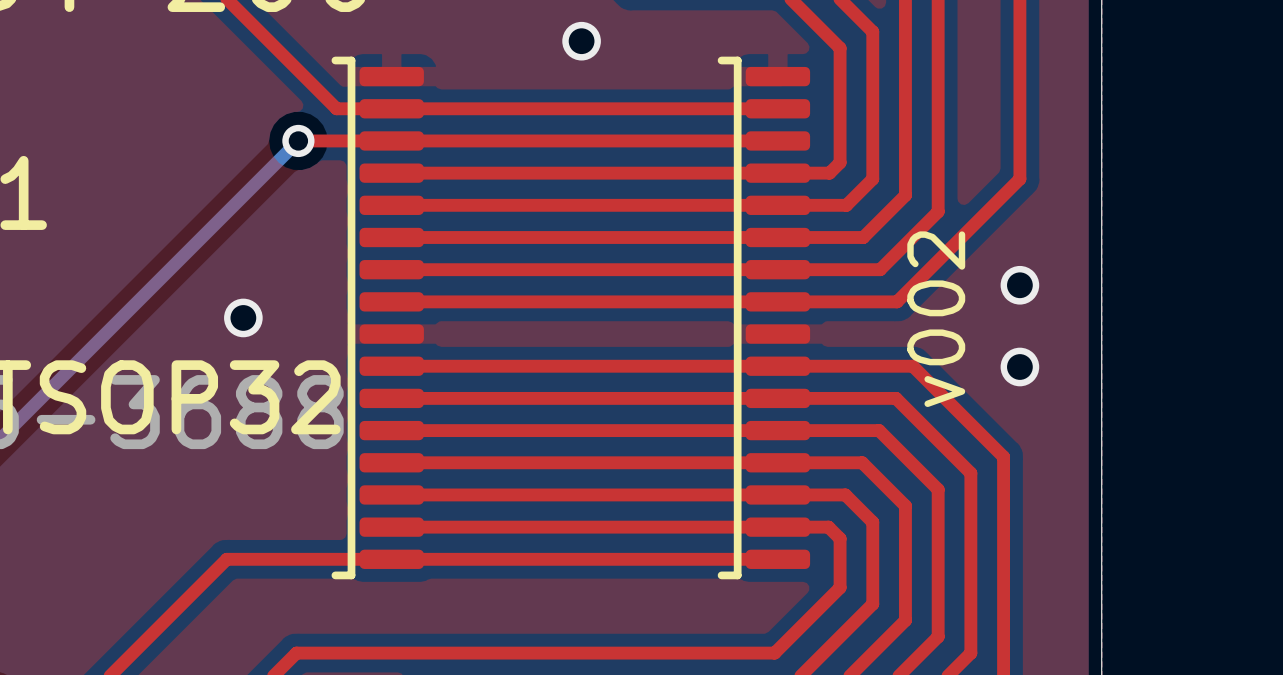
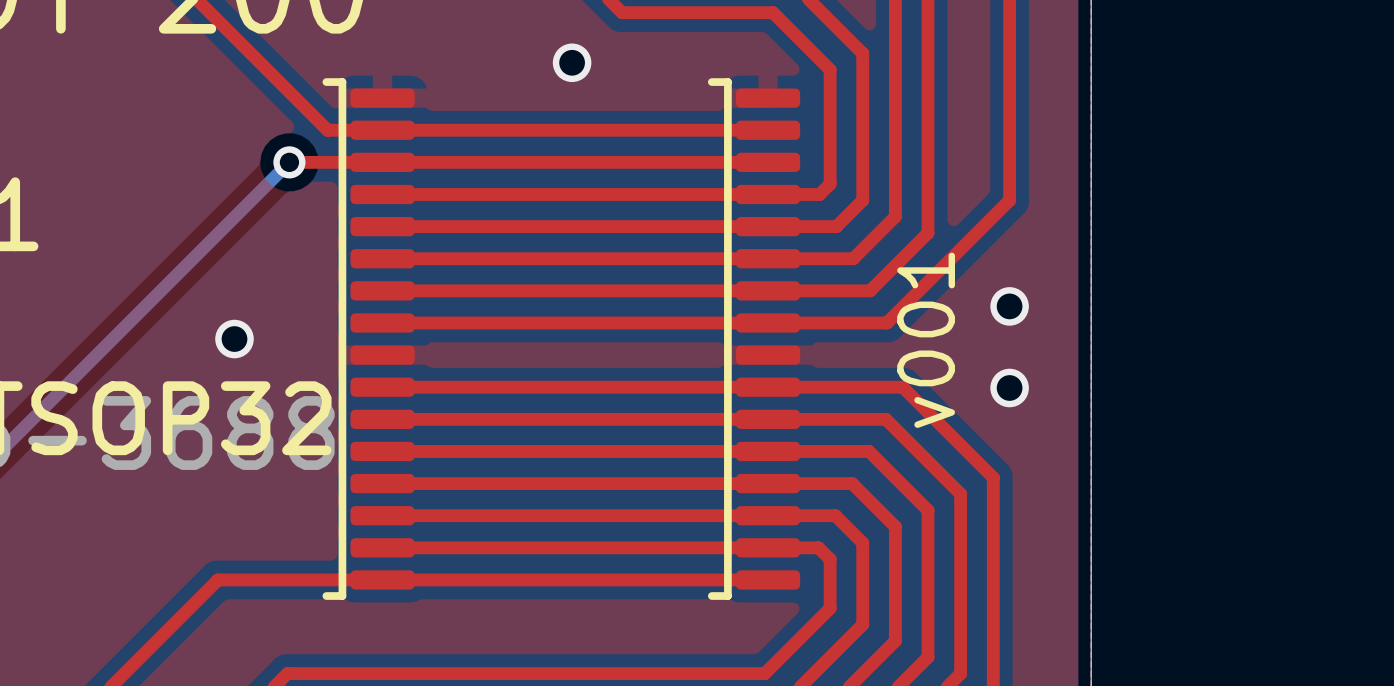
text: v002 (936, 319) -> v001 (926, 340)

